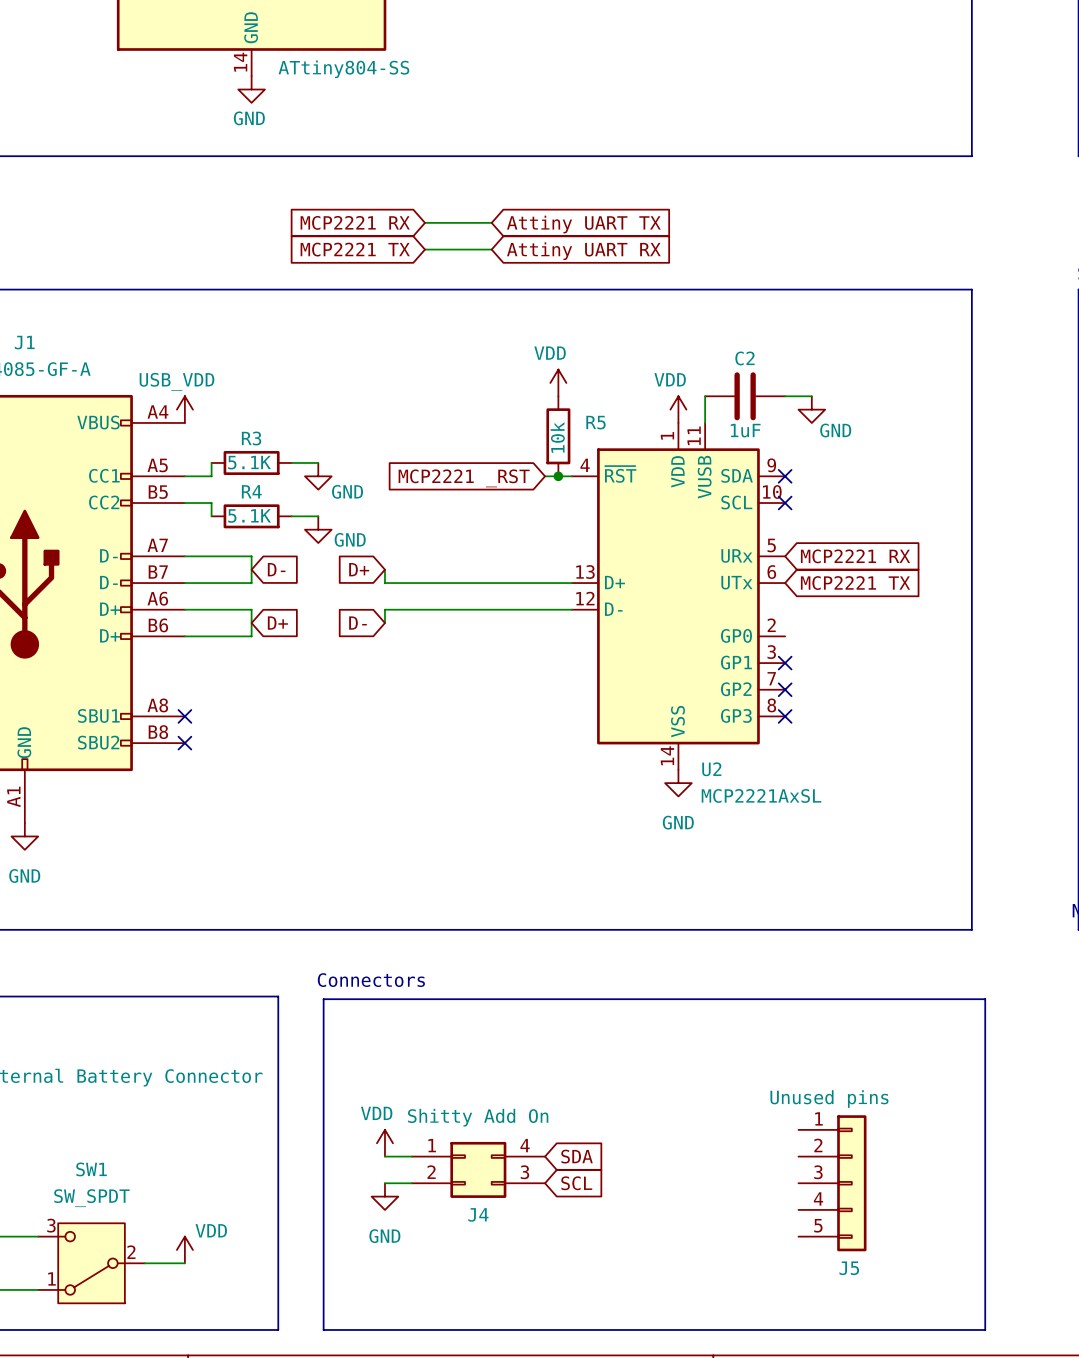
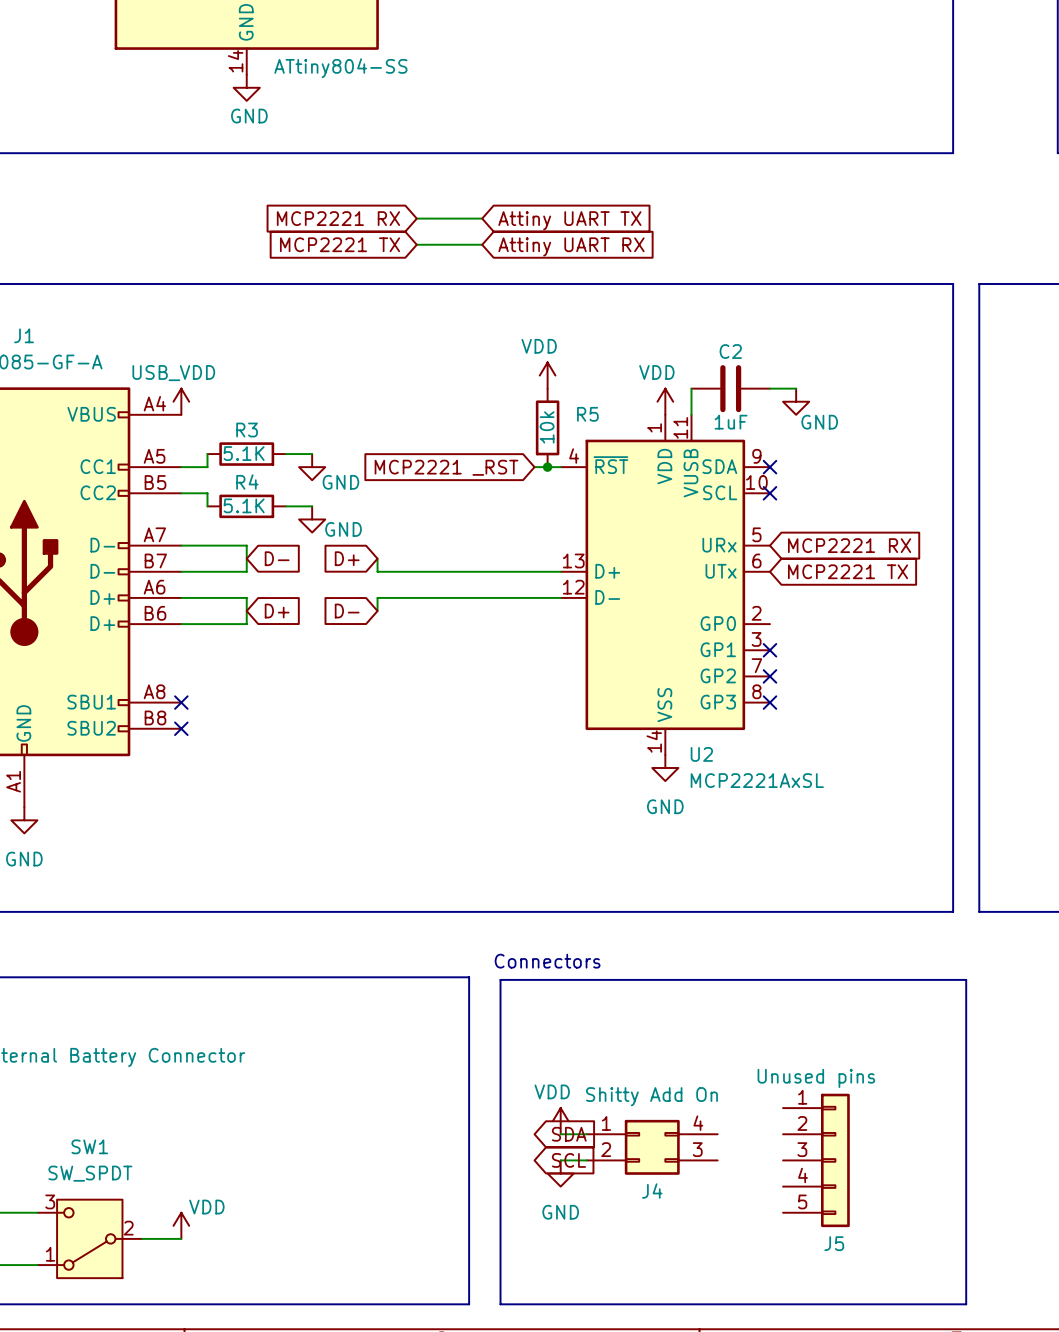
line: (1078, 289) (1078, 929) -> (1057, 284) (979, 284) (979, 911) (1057, 911)
text position: Connectors (371, 980) -> Connectors (547, 961)
line: (278, 996) (278, 1329) -> (272, 977) (469, 977) (469, 1304)
line: (510, 999) (323, 999) (323, 1329) -> (500, 979) (500, 1304)
power symbol position: VDD (384, 1143) -> VDD (560, 1121)
wire: (384, 1156) (411, 1156) -> (560, 1134) (586, 1134)
J4 position: (478, 1169) -> (652, 1147)
wire: (384, 1183) (411, 1183) -> (560, 1160) (586, 1160)
power symbol position: GND (384, 1196) -> GND (560, 1173)
line: none -> (272, 1304) (317, 1304)
line: (478, 1329) (510, 1329) -> none

